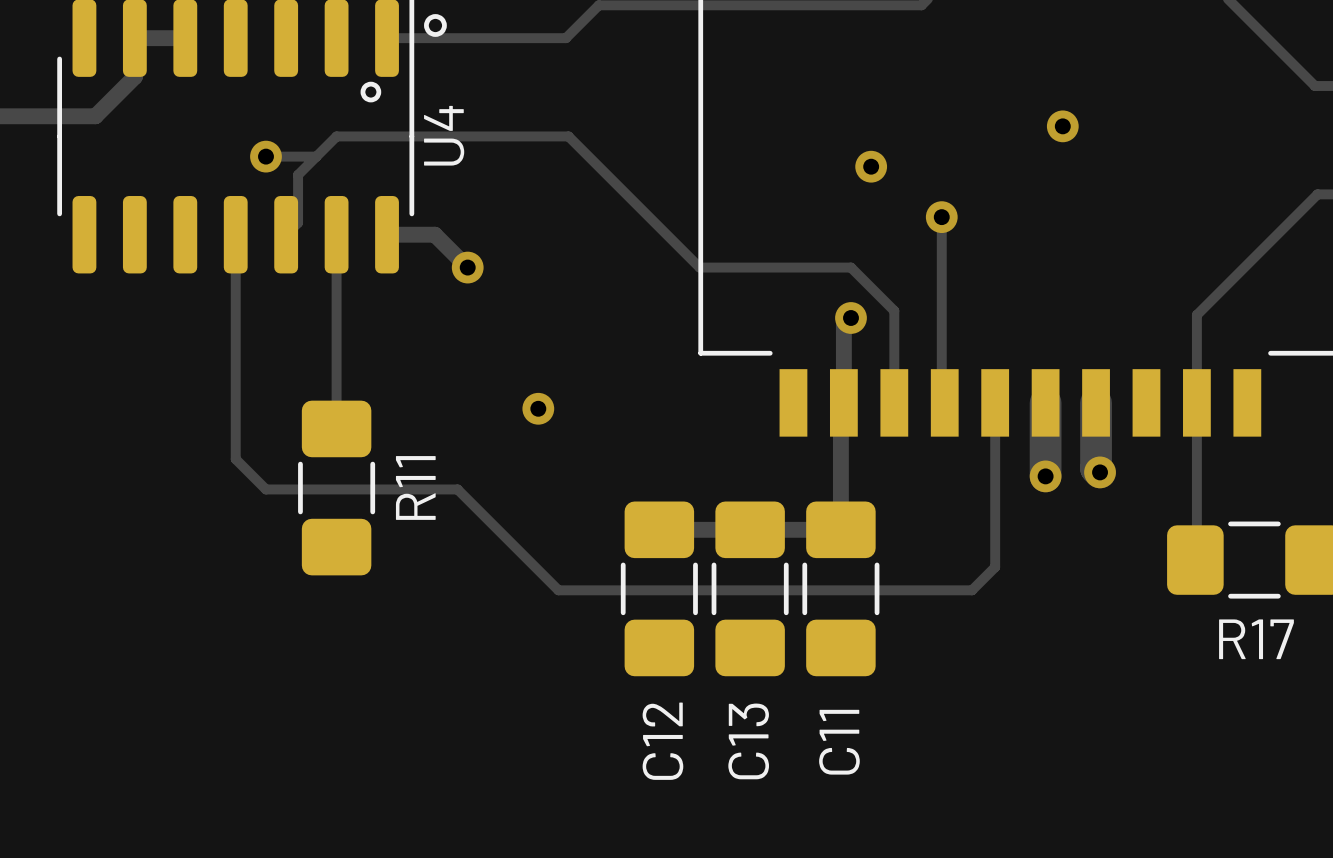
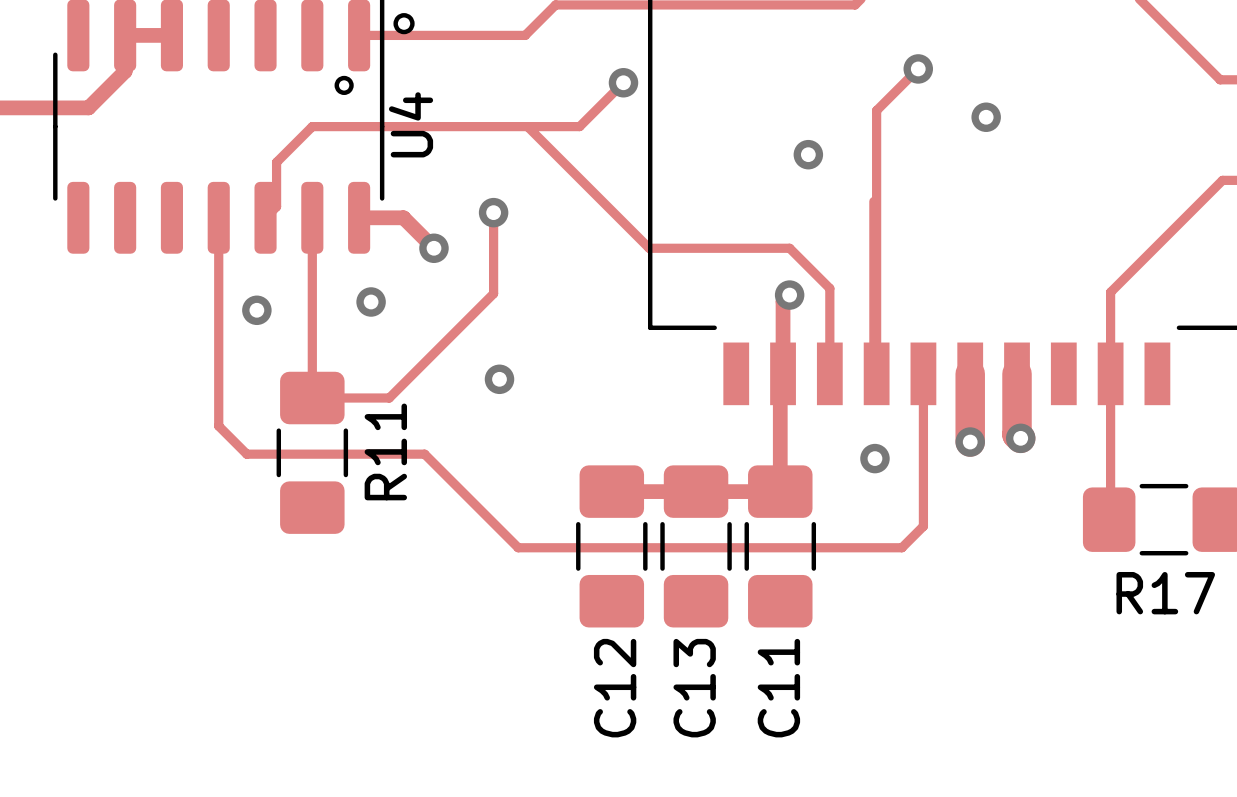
track: none -> (918, 68) (876, 110) (876, 373)
via: none -> (918, 68)
track: none -> (623, 82) (579, 126) (527, 126)
via: none -> (623, 82)
track: (265, 156) (316, 156) -> none
via: (265, 156) -> none
via: (941, 217) -> none
track: none -> (493, 212) (493, 293) (389, 398) (312, 398)
via: none -> (493, 212)
via: none -> (371, 301)
via: none -> (256, 310)
via: none -> (874, 458)

